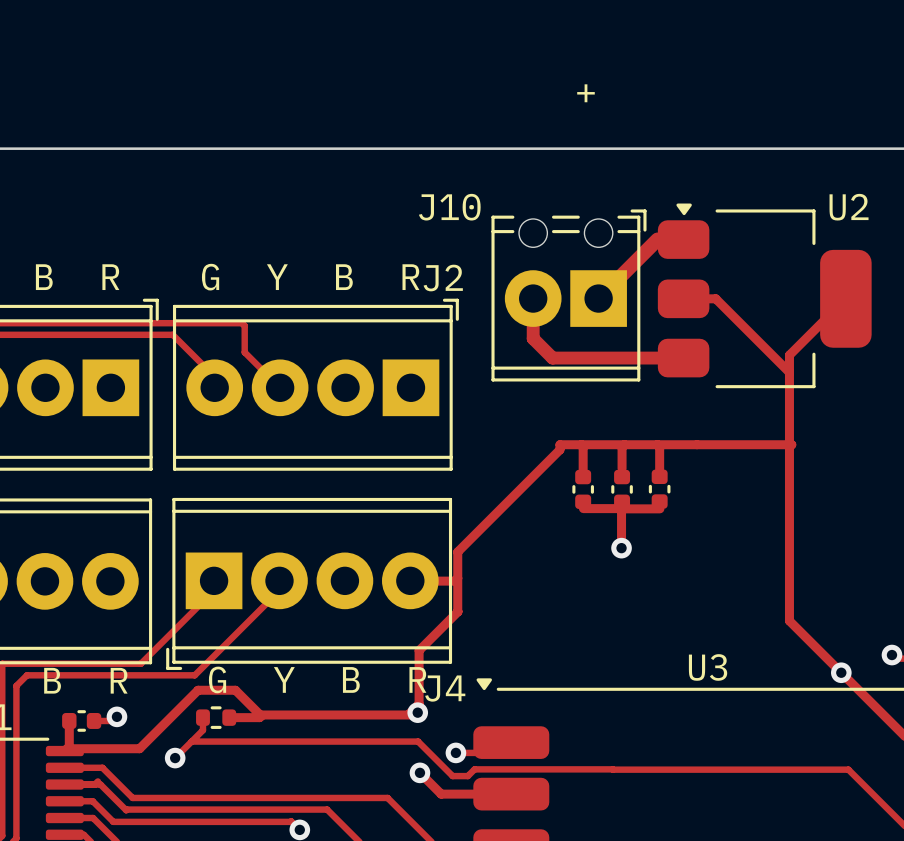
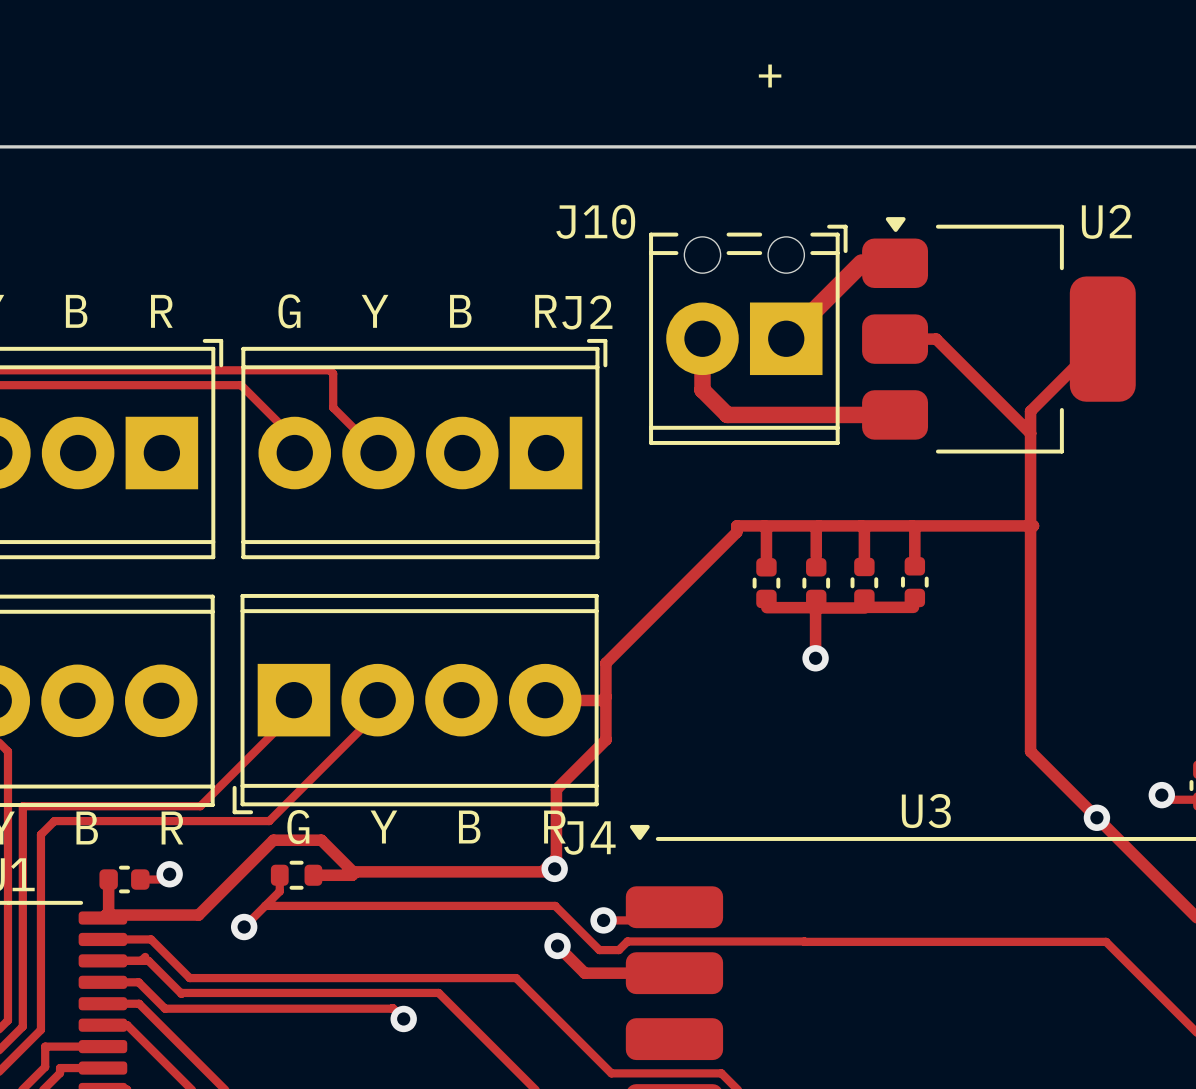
track: none -> (912, 525) (914, 528) (914, 563)
part: none -> (914, 582)
track: none -> (865, 607) (913, 607)

